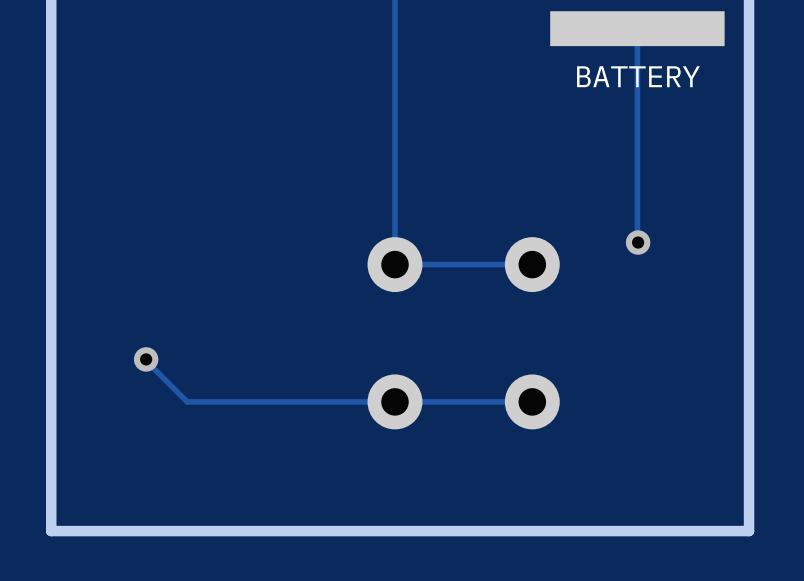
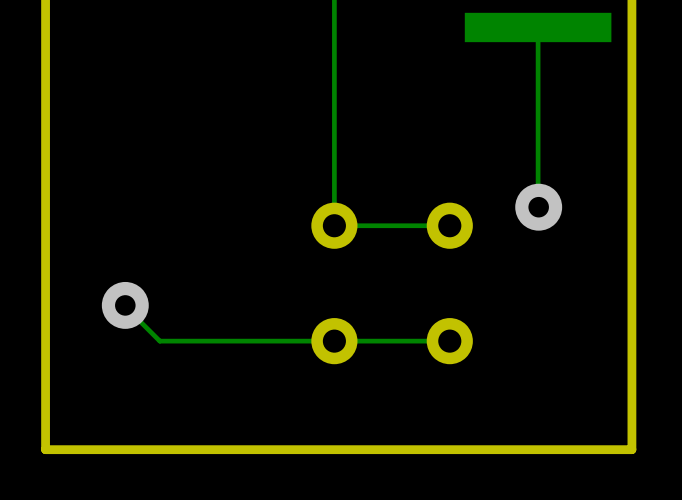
part value: BATTERY (638, 76) -> none
via size: [625, 230, 651, 255] -> [515, 183, 563, 231]
via size: [133, 347, 159, 372] -> [101, 281, 149, 329]

